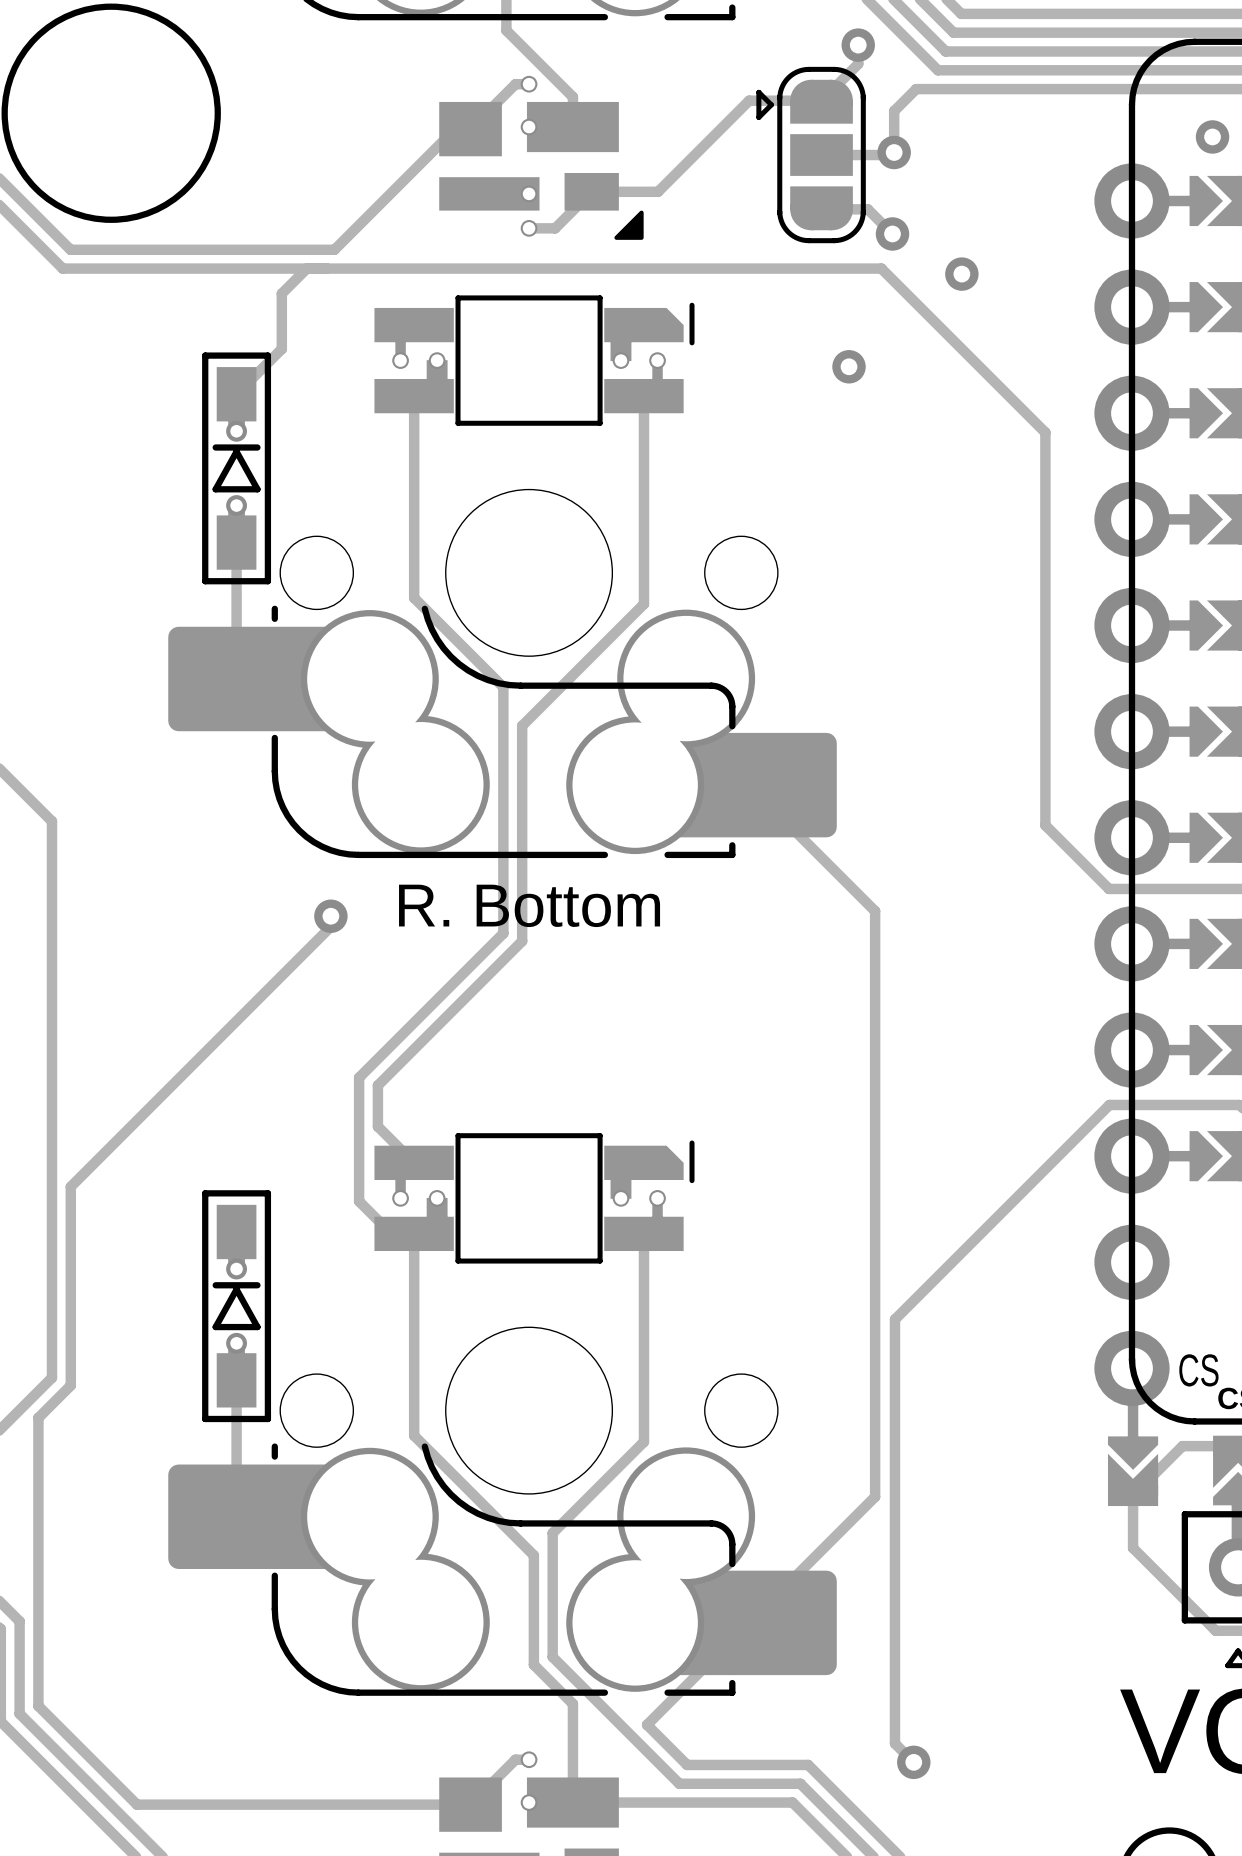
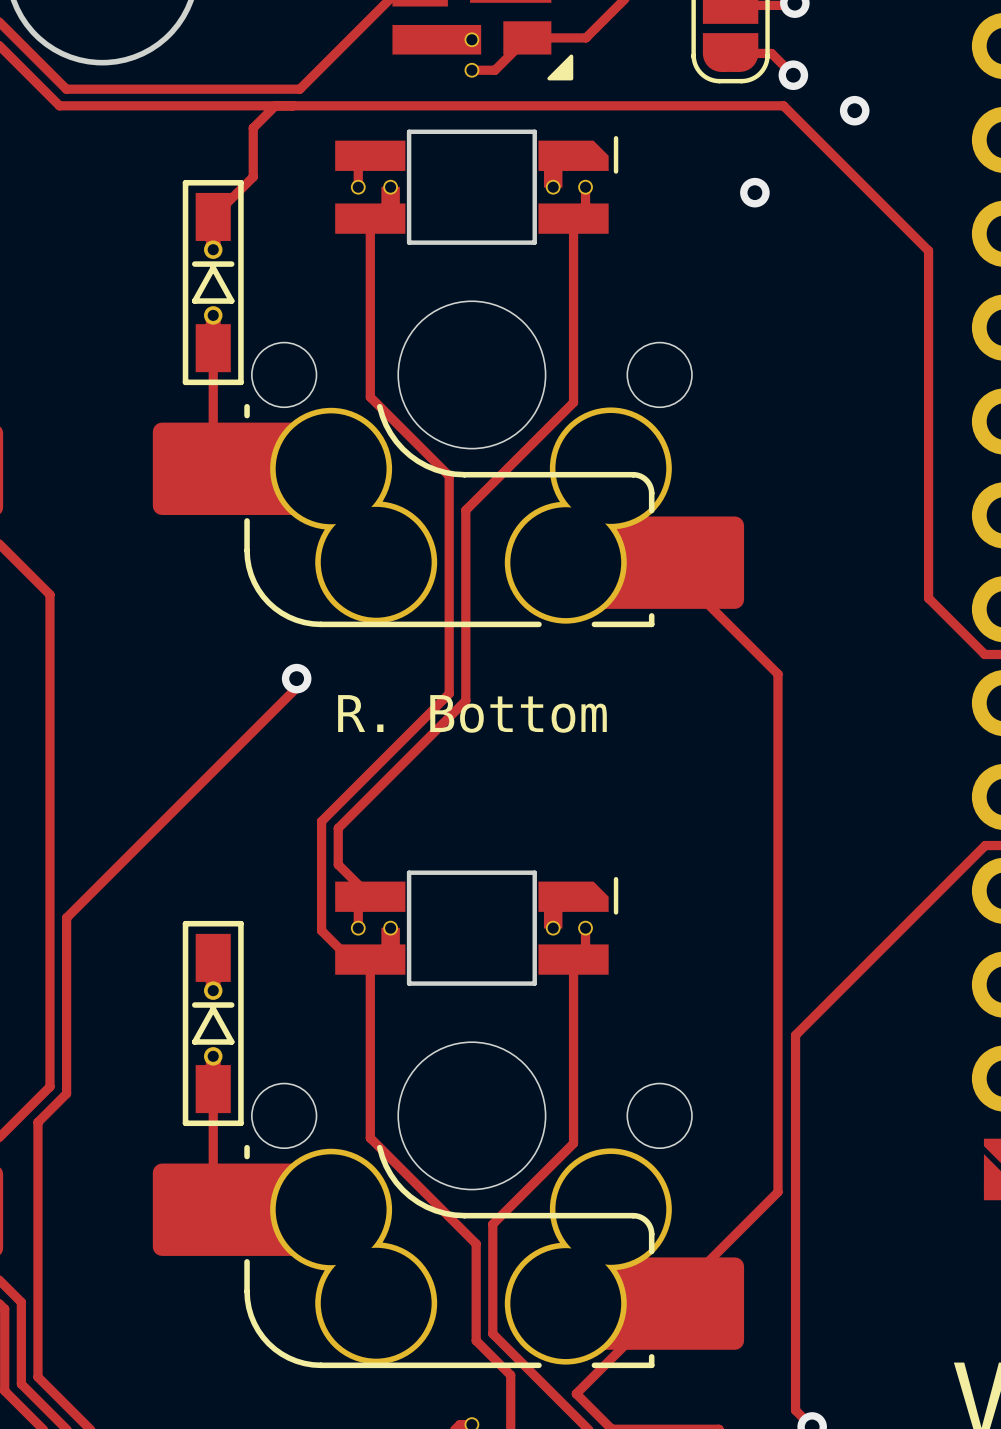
text position: R. Bottom (529, 905) -> R. Bottom (472, 713)

